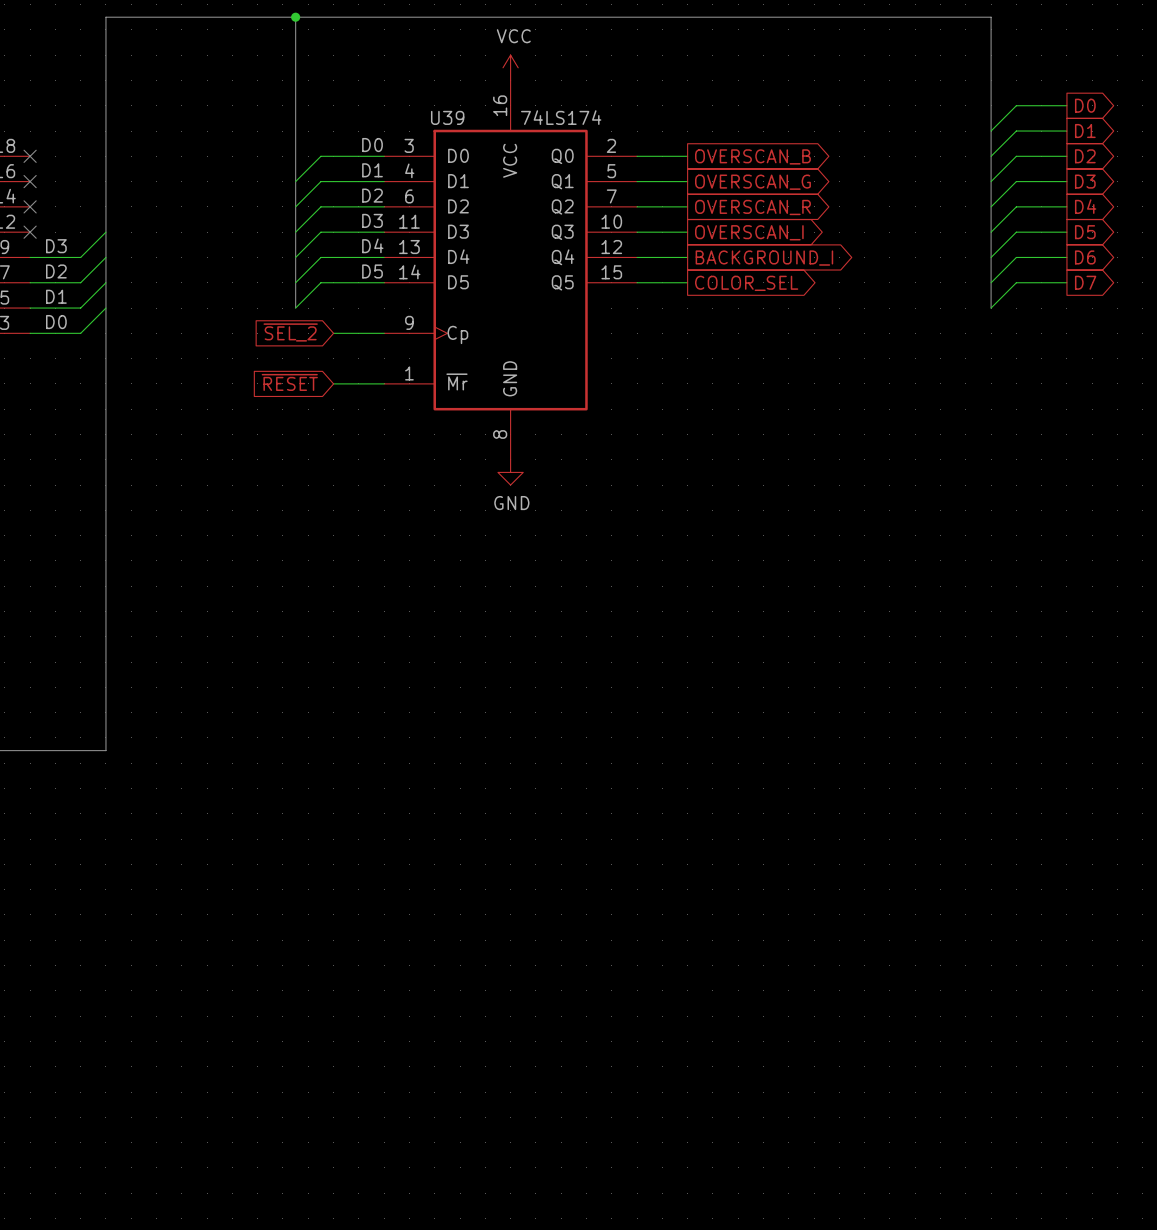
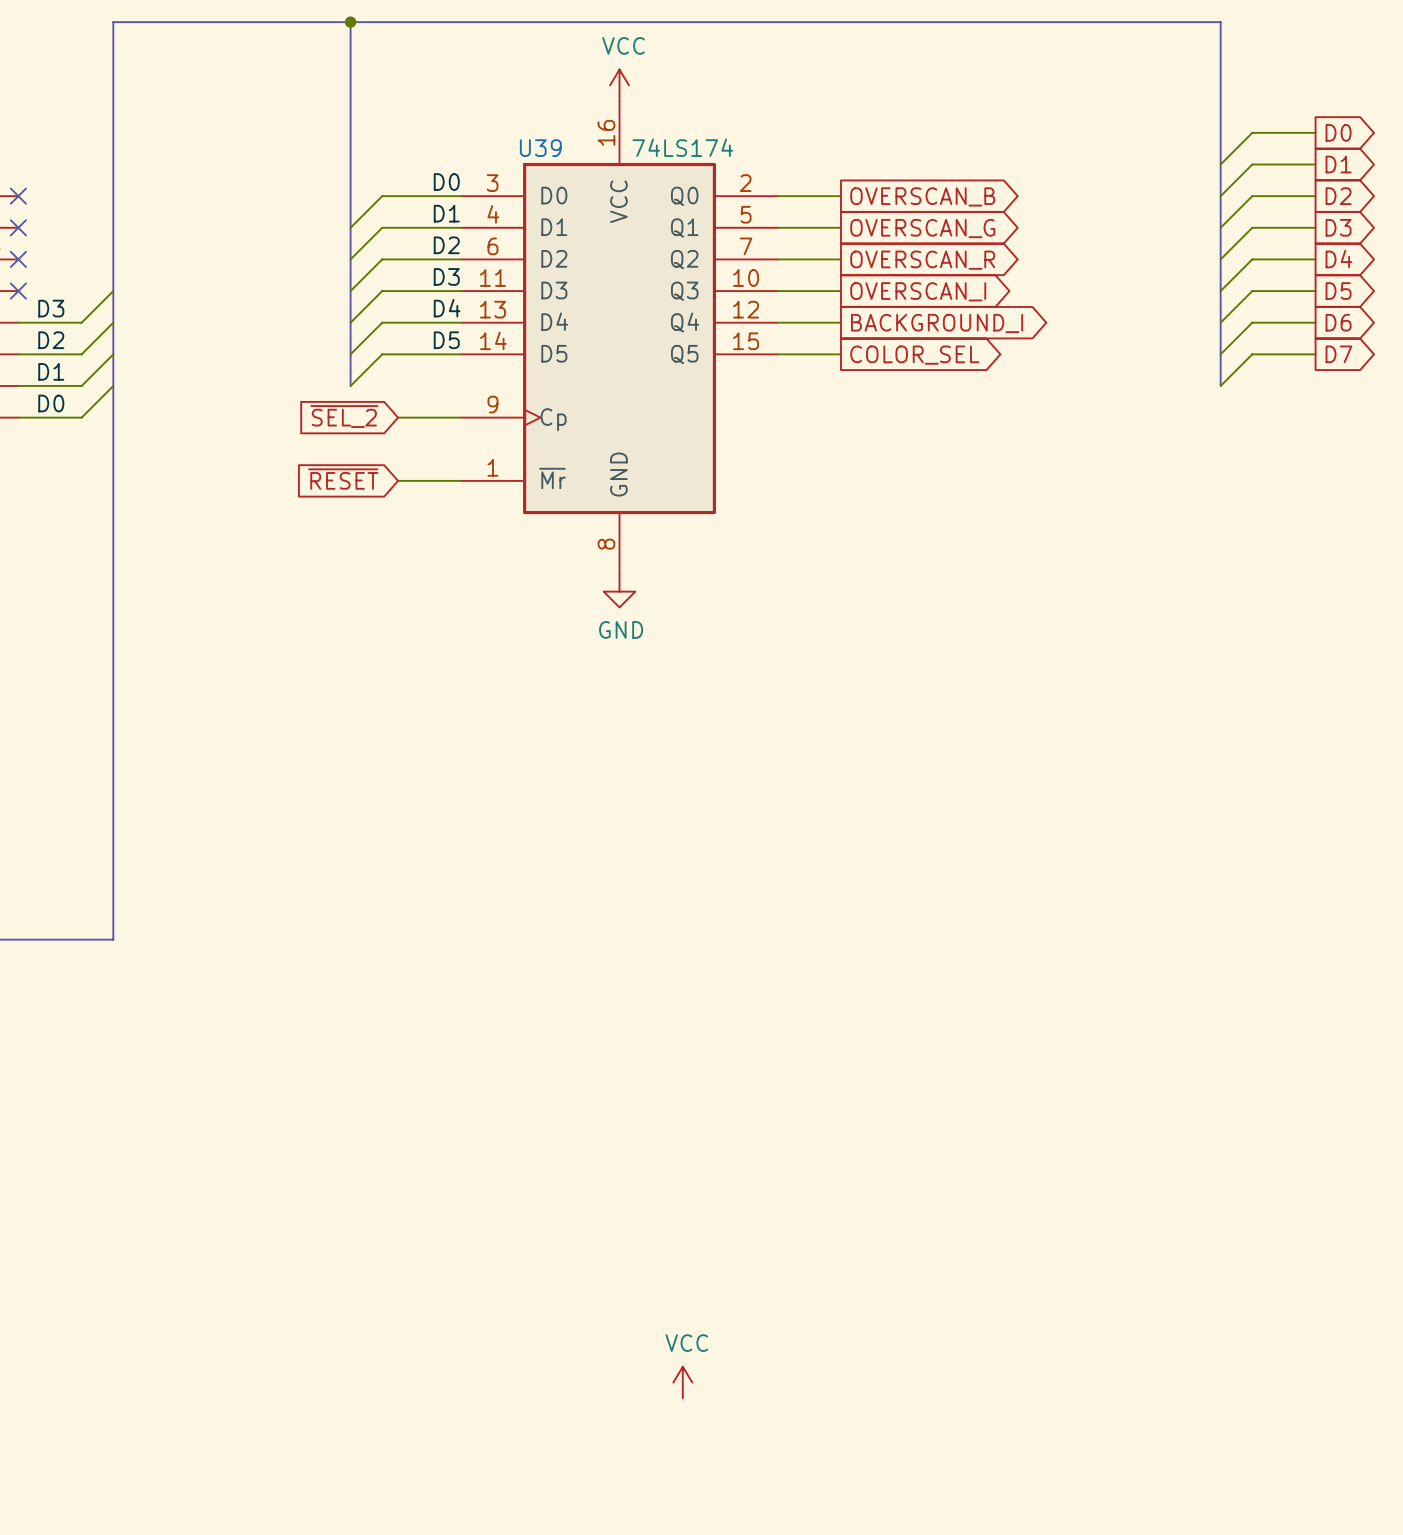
power symbol: none -> VCC (682, 1382)

